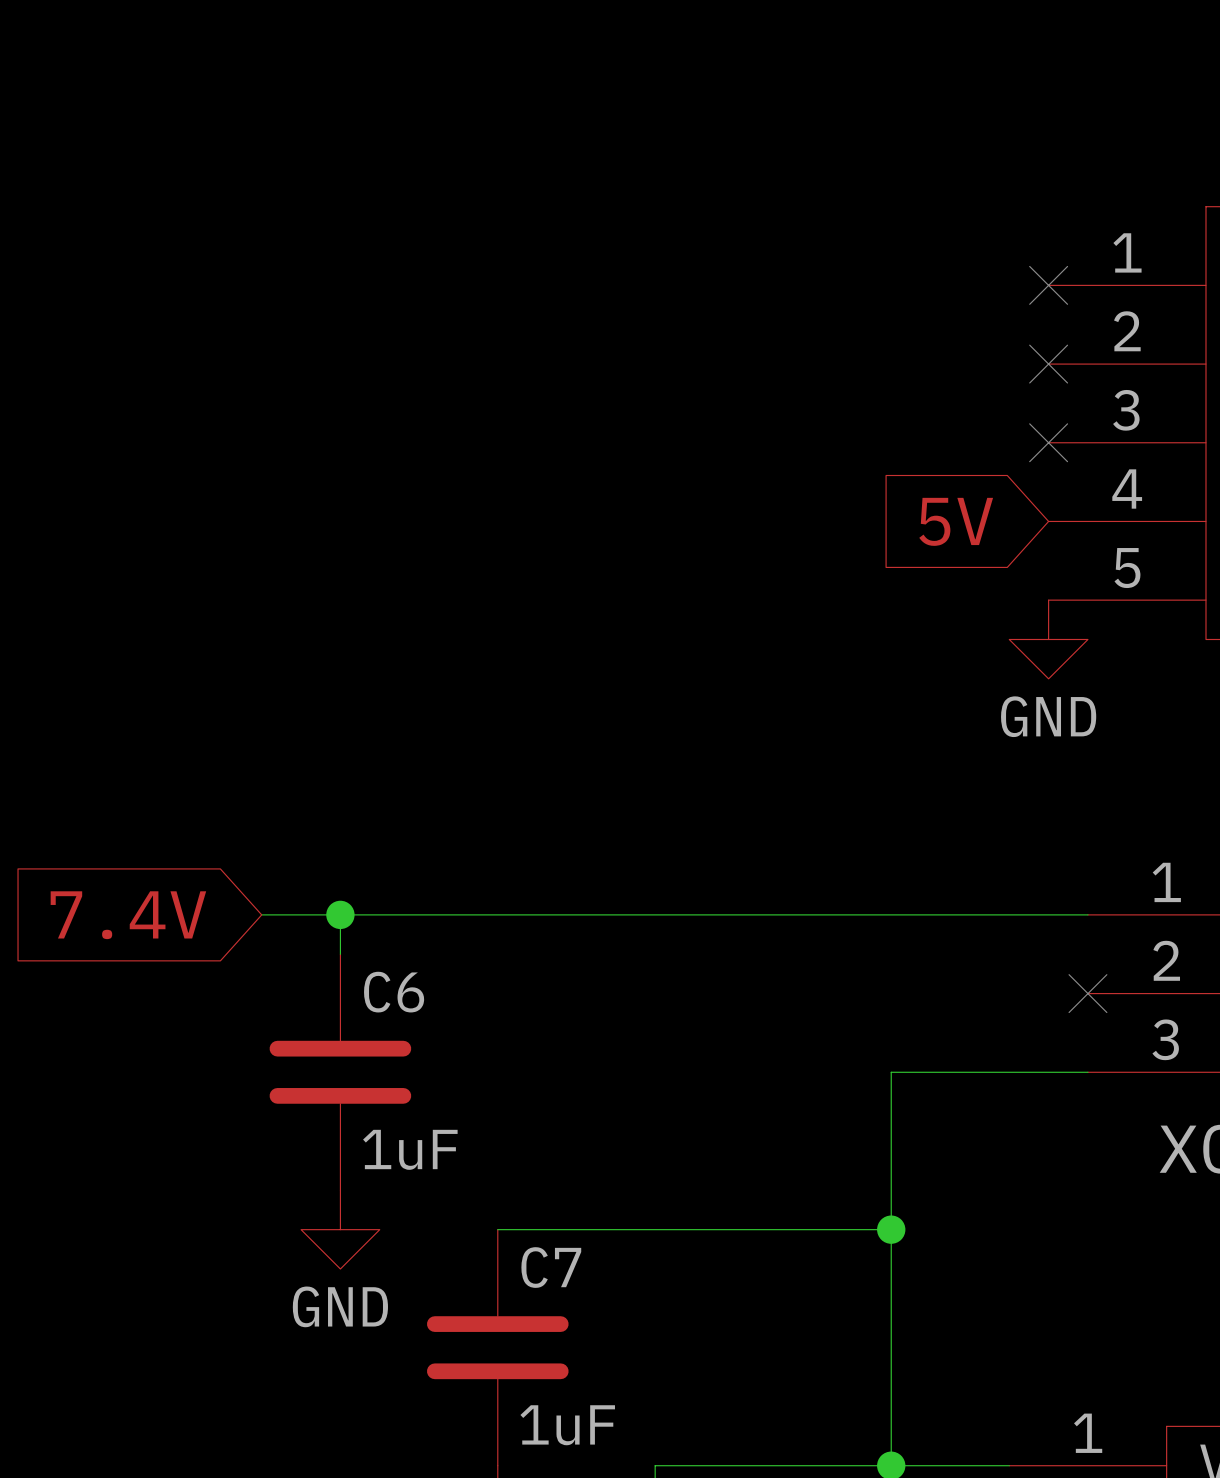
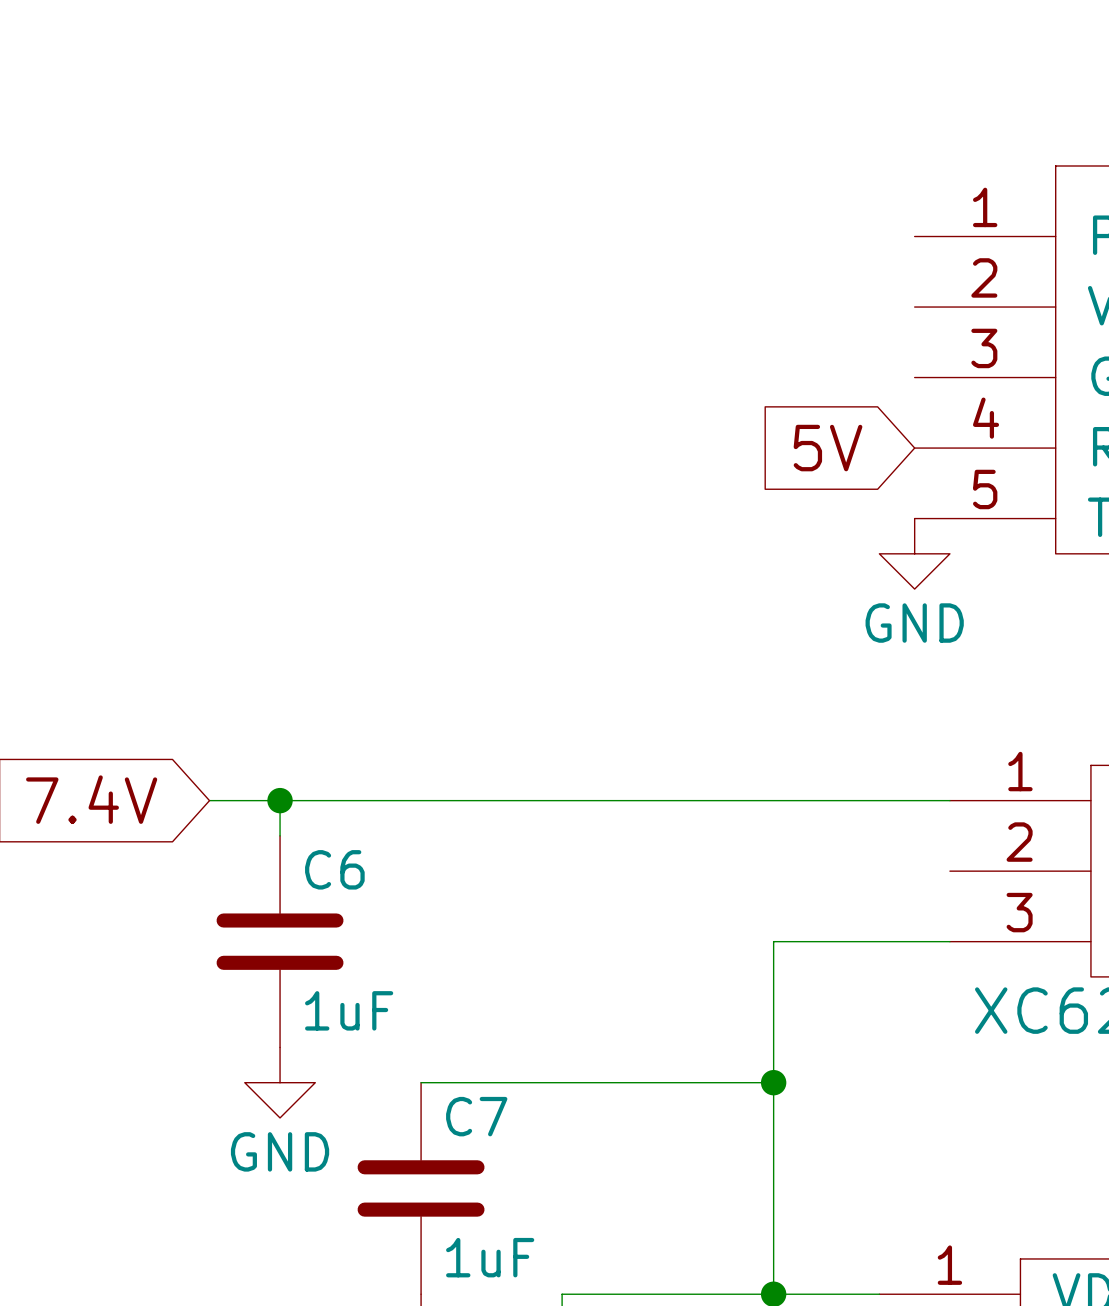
no-connect mark: (1048, 285) -> none
no-connect mark: (1048, 364) -> none
no-connect mark: (1048, 442) -> none
no-connect mark: (1087, 993) -> none

